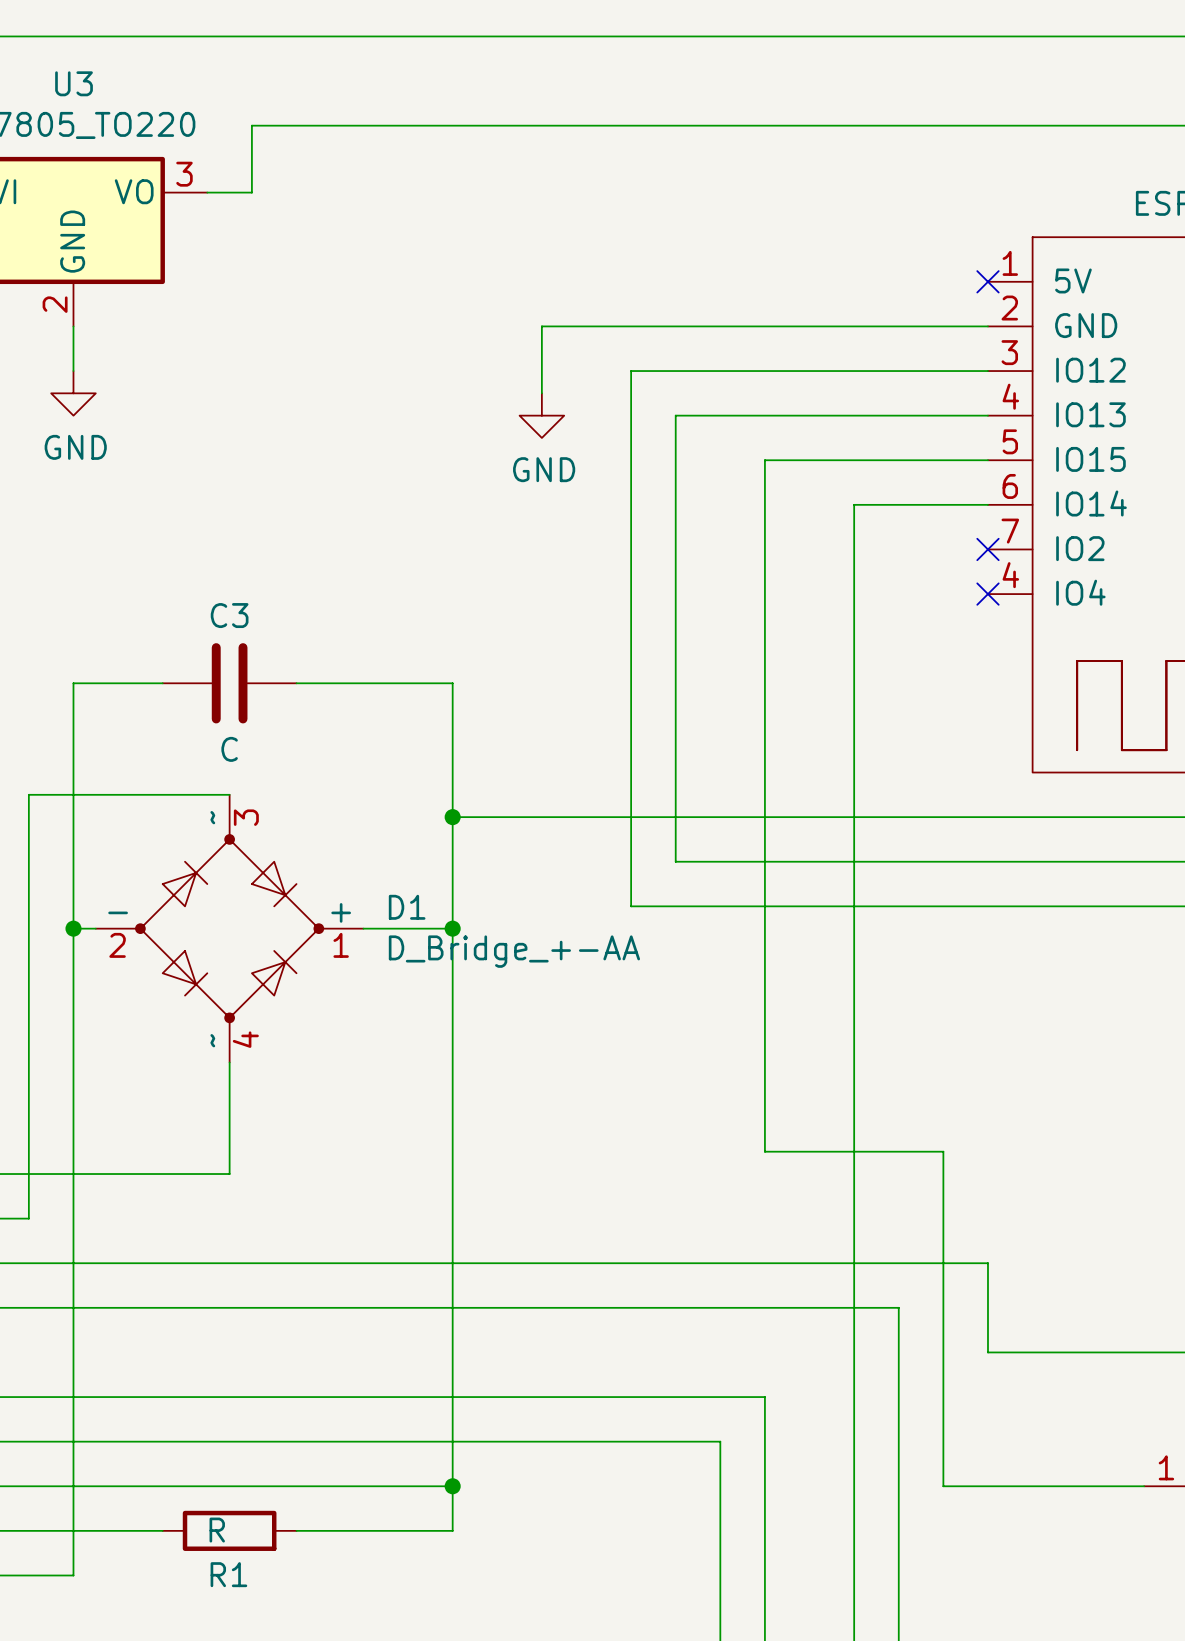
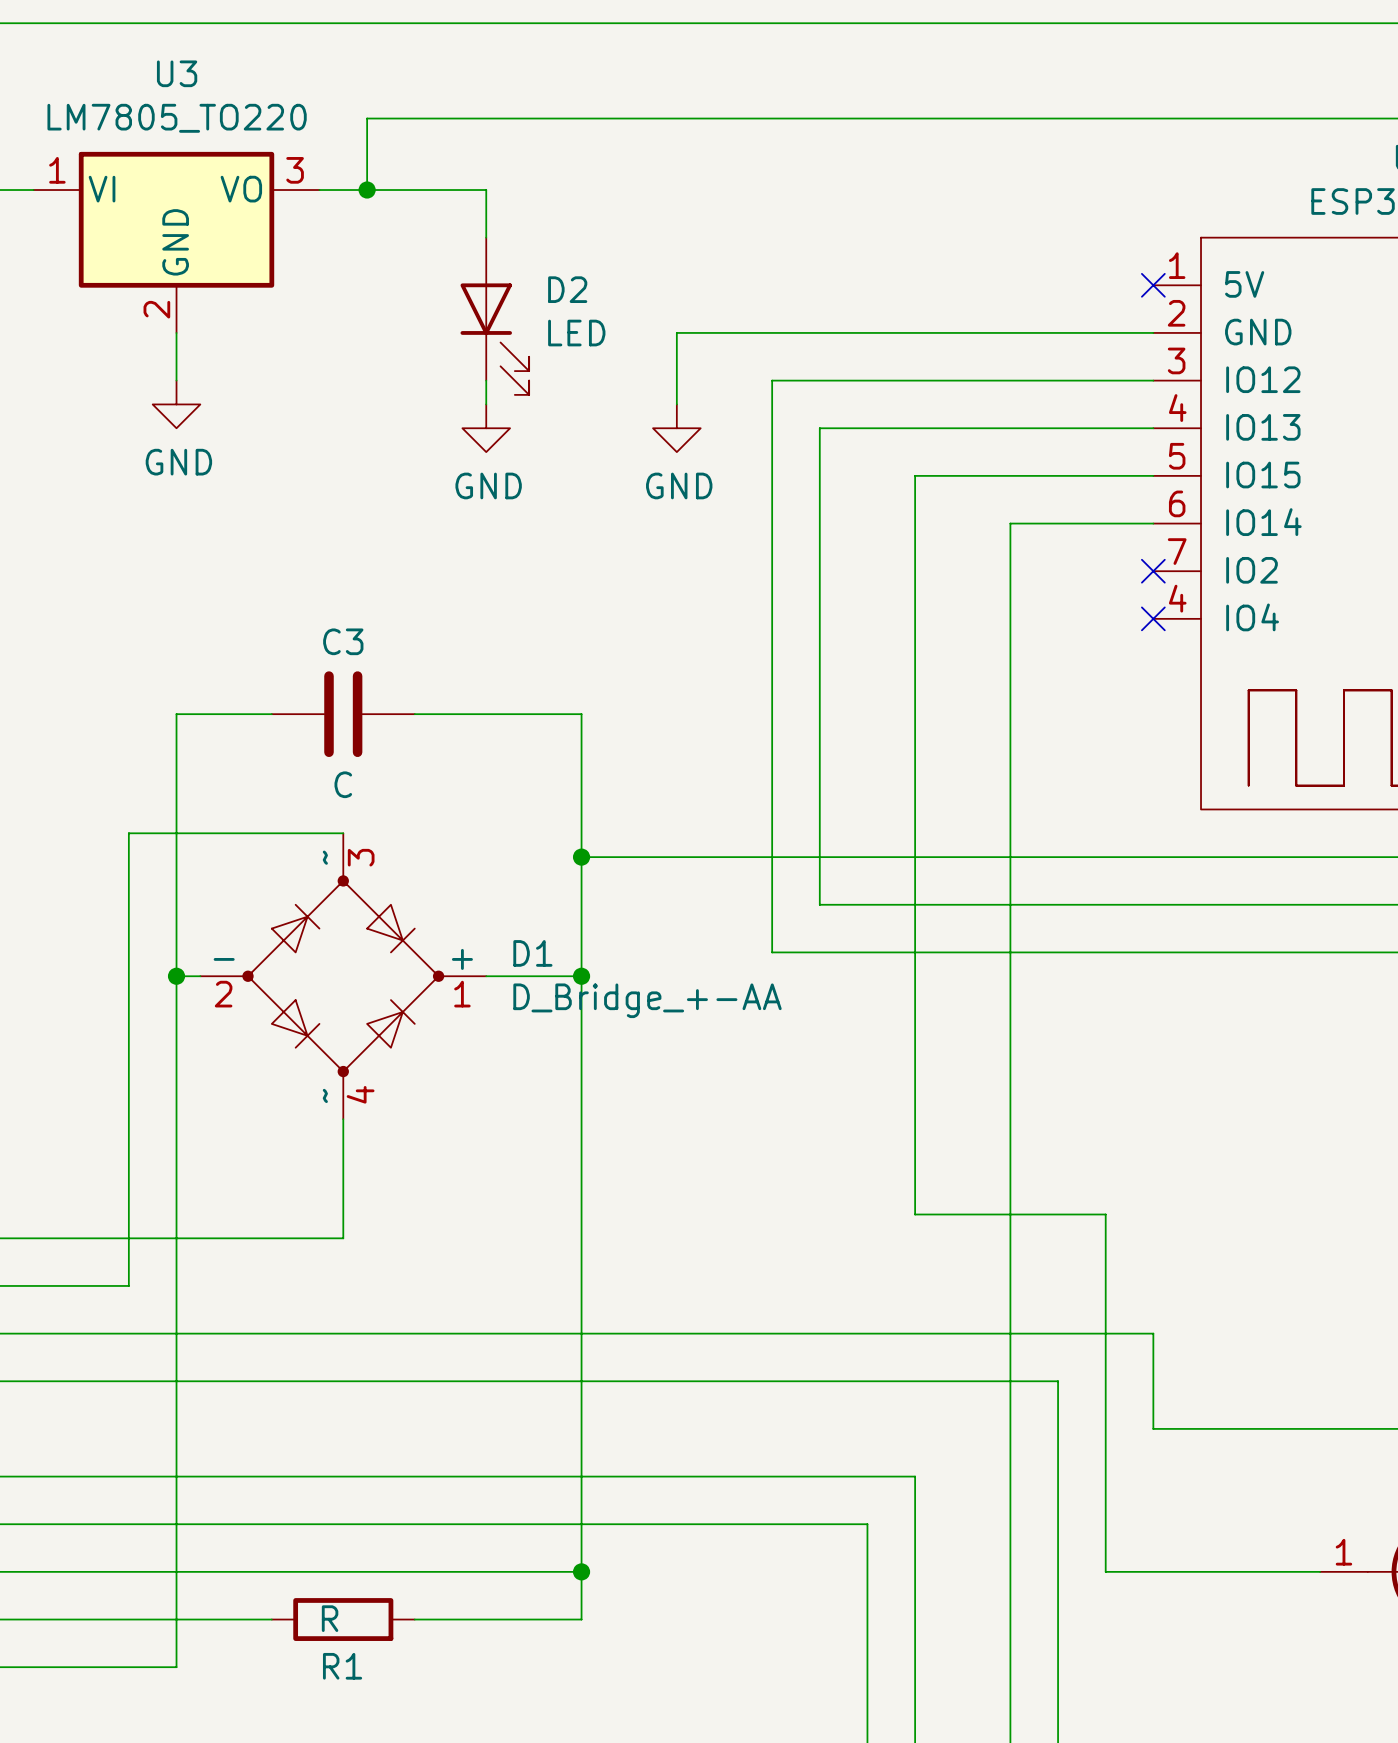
wire: none -> (367, 190) (486, 190) (486, 237)
junction: none -> (367, 190)
D2: none -> LED (494, 316)
wire: none -> (486, 380) (486, 404)
power symbol: none -> GND (486, 428)

